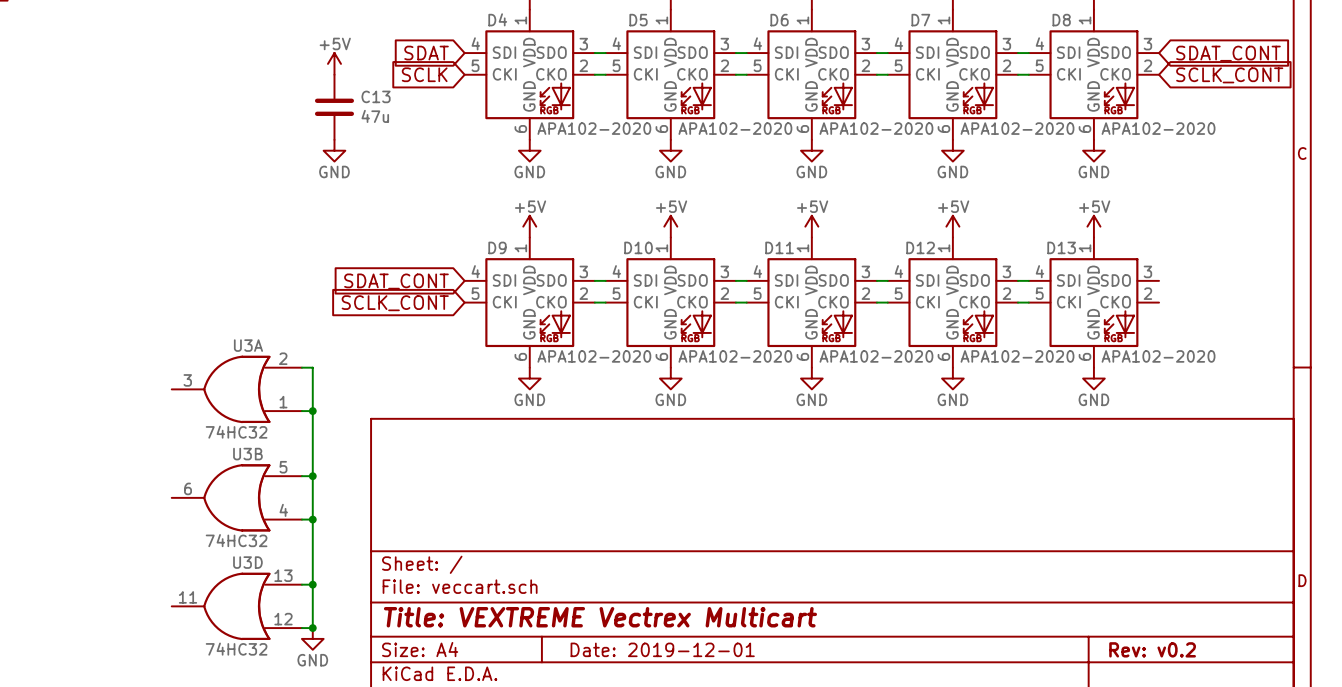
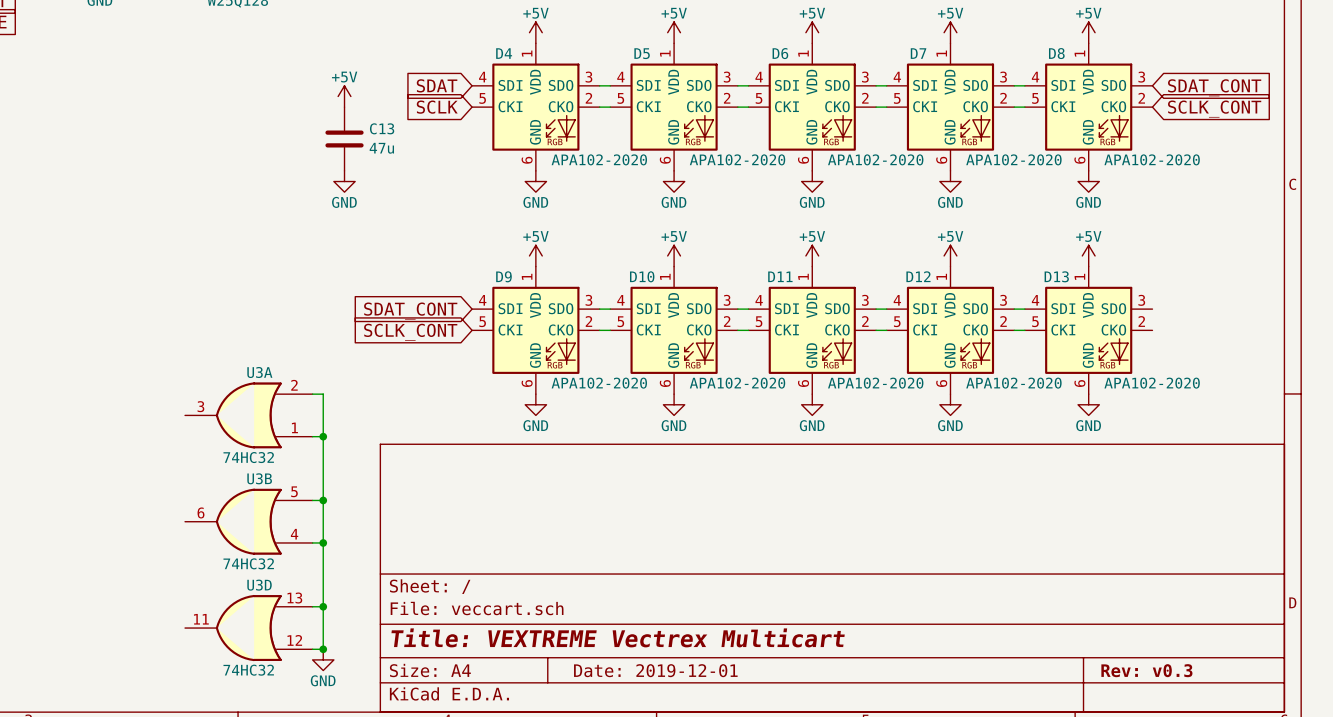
title block: Rev: v0.2 (1152, 649) -> Rev: v0.3 (1146, 670)

